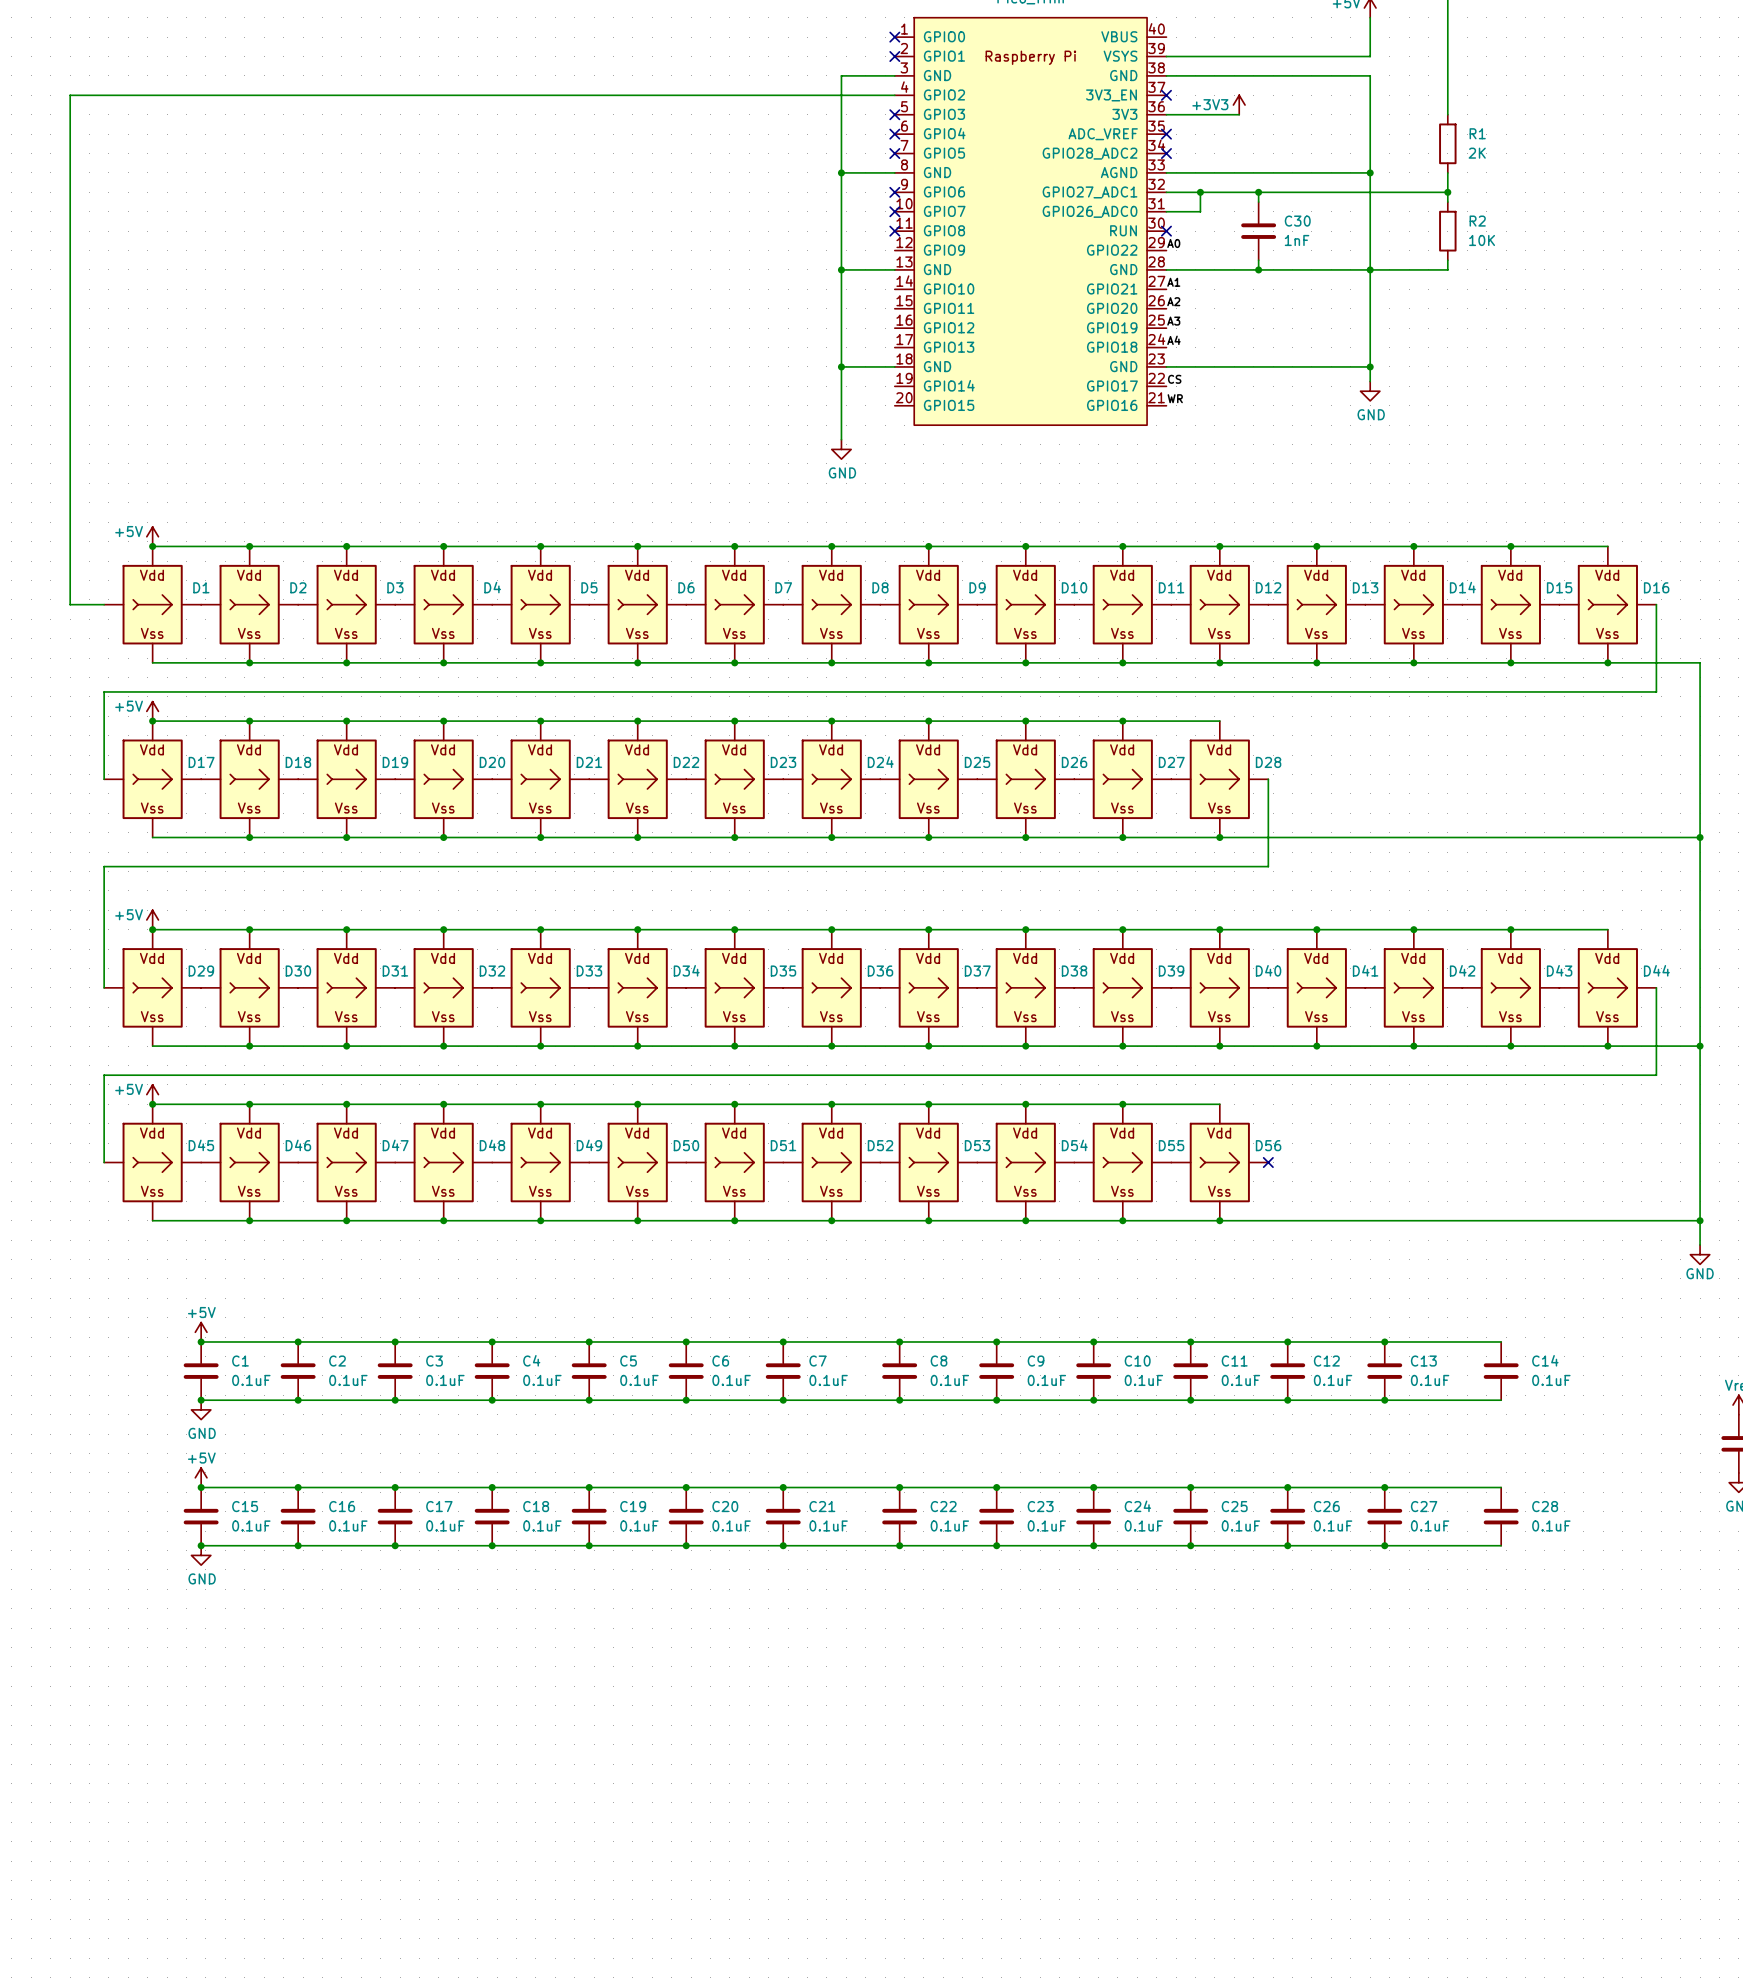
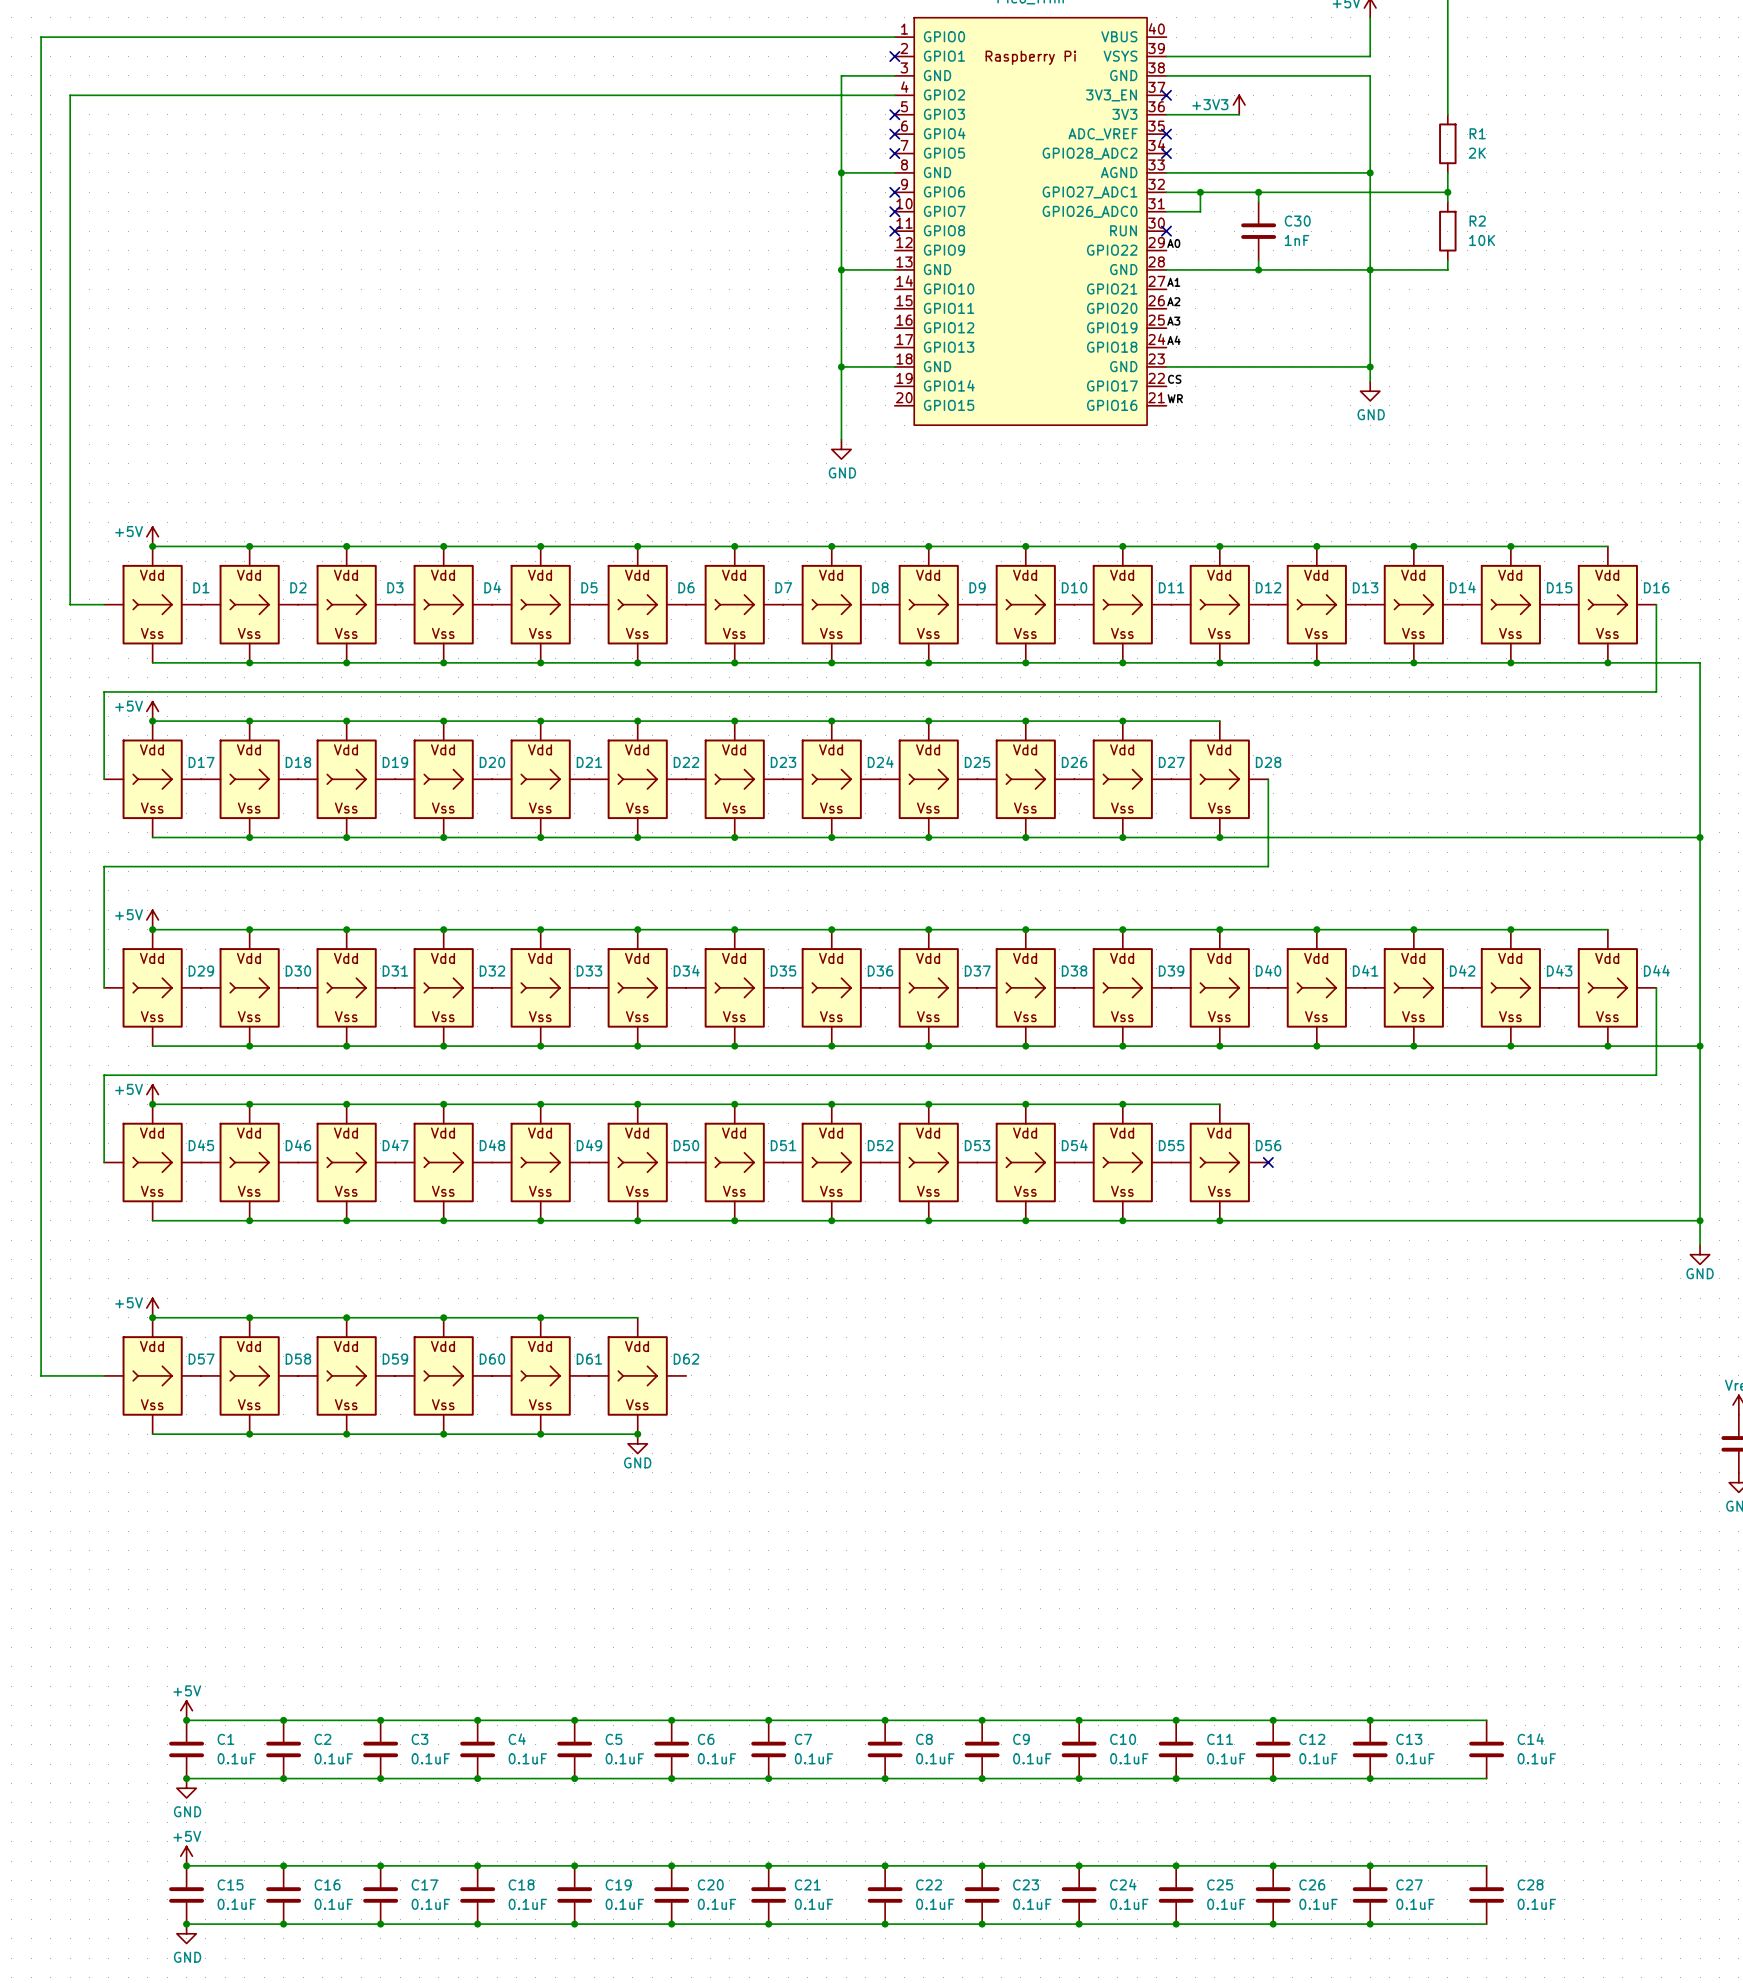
wire: none -> (894, 37) (41, 37) (41, 1375) (104, 1375)
no-connect mark: (894, 37) -> none
power symbol text position: +5V (201, 1312) -> +5V (129, 1302)
wire: none -> (152, 1317) (637, 1317)
junction: none -> (152, 1317)
junction: none -> (249, 1317)
junction: none -> (346, 1317)
junction: none -> (443, 1317)
junction: none -> (540, 1317)
power symbol position: +5V (201, 1332) -> +5V (152, 1308)
wire: (201, 1341) (1501, 1341) -> none
junction: (201, 1341) -> none
junction: (298, 1341) -> none
junction: (395, 1341) -> none
junction: (492, 1341) -> none
junction: (589, 1341) -> none
junction: (686, 1341) -> none
junction: (783, 1341) -> none
junction: (899, 1341) -> none
junction: (996, 1341) -> none
junction: (1093, 1341) -> none
junction: (1190, 1341) -> none
junction: (1287, 1341) -> none
junction: (1384, 1341) -> none
C1 position: (201, 1371) -> (186, 1749)
C2 position: (298, 1371) -> (283, 1749)
C3 position: (395, 1371) -> (380, 1749)
C4 position: (492, 1371) -> (477, 1749)
C5 position: (589, 1371) -> (574, 1749)
C6 position: (686, 1371) -> (671, 1749)
C7 position: (783, 1371) -> (768, 1749)
C8 position: (899, 1371) -> (885, 1749)
C9 position: (996, 1371) -> (982, 1749)
C10 position: (1093, 1371) -> (1079, 1749)
C11 position: (1190, 1371) -> (1176, 1749)
C12 position: (1287, 1371) -> (1273, 1749)
C13 position: (1384, 1371) -> (1370, 1749)
C14 position: (1501, 1371) -> (1486, 1749)
D57: none -> (152, 1375)
D58: none -> (249, 1375)
D59: none -> (346, 1375)
D60: none -> (443, 1375)
D61: none -> (540, 1375)
D62: none -> (637, 1375)
wire: (201, 1400) (1501, 1400) -> none
junction: (201, 1400) -> none
junction: (298, 1400) -> none
junction: (395, 1400) -> none
junction: (492, 1400) -> none
junction: (589, 1400) -> none
junction: (686, 1400) -> none
junction: (783, 1400) -> none
junction: (899, 1400) -> none
junction: (996, 1400) -> none
junction: (1093, 1400) -> none
junction: (1190, 1400) -> none
junction: (1287, 1400) -> none
junction: (1384, 1400) -> none
power symbol: GND (201, 1409) -> none
wire: none -> (152, 1434) (637, 1434)
junction: none -> (249, 1434)
junction: none -> (346, 1434)
junction: none -> (443, 1434)
junction: none -> (540, 1434)
junction: none -> (637, 1434)
power symbol: none -> GND (637, 1443)
power symbol: +5V (201, 1477) -> none
wire: (201, 1487) (1501, 1487) -> none
junction: (201, 1487) -> none
junction: (298, 1487) -> none
junction: (395, 1487) -> none
junction: (492, 1487) -> none
junction: (589, 1487) -> none
junction: (686, 1487) -> none
junction: (783, 1487) -> none
junction: (899, 1487) -> none
junction: (996, 1487) -> none
junction: (1093, 1487) -> none
junction: (1190, 1487) -> none
junction: (1287, 1487) -> none
junction: (1384, 1487) -> none
C15 position: (201, 1516) -> (186, 1894)
C16 position: (298, 1516) -> (283, 1894)
C17 position: (395, 1516) -> (380, 1894)
C18 position: (492, 1516) -> (477, 1894)
C19 position: (589, 1516) -> (574, 1894)
C20 position: (686, 1516) -> (671, 1894)
C21 position: (783, 1516) -> (768, 1894)
C22 position: (899, 1516) -> (885, 1894)
C23 position: (996, 1516) -> (982, 1894)
C24 position: (1093, 1516) -> (1079, 1894)
C25 position: (1190, 1516) -> (1176, 1894)
C26 position: (1287, 1516) -> (1273, 1894)
C27 position: (1384, 1516) -> (1370, 1894)
C28 position: (1501, 1516) -> (1486, 1894)
wire: (201, 1545) (1501, 1545) -> (186, 1720) (1486, 1720)
junction: (201, 1545) -> none
junction: (298, 1545) -> none
junction: (395, 1545) -> none
junction: (492, 1545) -> none
junction: (589, 1545) -> none
junction: (686, 1545) -> none
junction: (783, 1545) -> none
junction: (899, 1545) -> none
junction: (996, 1545) -> none
junction: (1093, 1545) -> none
junction: (1190, 1545) -> none
junction: (1287, 1545) -> none
junction: (1384, 1545) -> none
power symbol: GND (201, 1555) -> none
power symbol: none -> +5V (186, 1710)
junction: none -> (186, 1720)
junction: none -> (283, 1720)
junction: none -> (380, 1720)
junction: none -> (477, 1720)
junction: none -> (574, 1720)
junction: none -> (671, 1720)
junction: none -> (768, 1720)
junction: none -> (885, 1720)
junction: none -> (982, 1720)
junction: none -> (1079, 1720)
junction: none -> (1176, 1720)
junction: none -> (1273, 1720)
junction: none -> (1370, 1720)
wire: none -> (186, 1778) (1486, 1778)
junction: none -> (186, 1778)
junction: none -> (283, 1778)
junction: none -> (380, 1778)
junction: none -> (477, 1778)
junction: none -> (574, 1778)
junction: none -> (671, 1778)
junction: none -> (768, 1778)
junction: none -> (885, 1778)
junction: none -> (982, 1778)
junction: none -> (1079, 1778)
junction: none -> (1176, 1778)
junction: none -> (1273, 1778)
junction: none -> (1370, 1778)
power symbol: none -> GND (186, 1788)
power symbol: none -> +5V (186, 1856)
wire: none -> (186, 1865) (1486, 1865)
junction: none -> (186, 1865)
junction: none -> (283, 1865)
junction: none -> (380, 1865)
junction: none -> (477, 1865)
junction: none -> (574, 1865)
junction: none -> (671, 1865)
junction: none -> (768, 1865)
junction: none -> (885, 1865)
junction: none -> (982, 1865)
junction: none -> (1079, 1865)
junction: none -> (1176, 1865)
junction: none -> (1273, 1865)
junction: none -> (1370, 1865)
wire: none -> (186, 1924) (1486, 1924)
junction: none -> (186, 1924)
junction: none -> (283, 1924)
junction: none -> (380, 1924)
junction: none -> (477, 1924)
junction: none -> (574, 1924)
junction: none -> (671, 1924)
junction: none -> (768, 1924)
junction: none -> (885, 1924)
junction: none -> (982, 1924)
junction: none -> (1079, 1924)
junction: none -> (1176, 1924)
junction: none -> (1273, 1924)
junction: none -> (1370, 1924)
power symbol: none -> GND (186, 1933)

